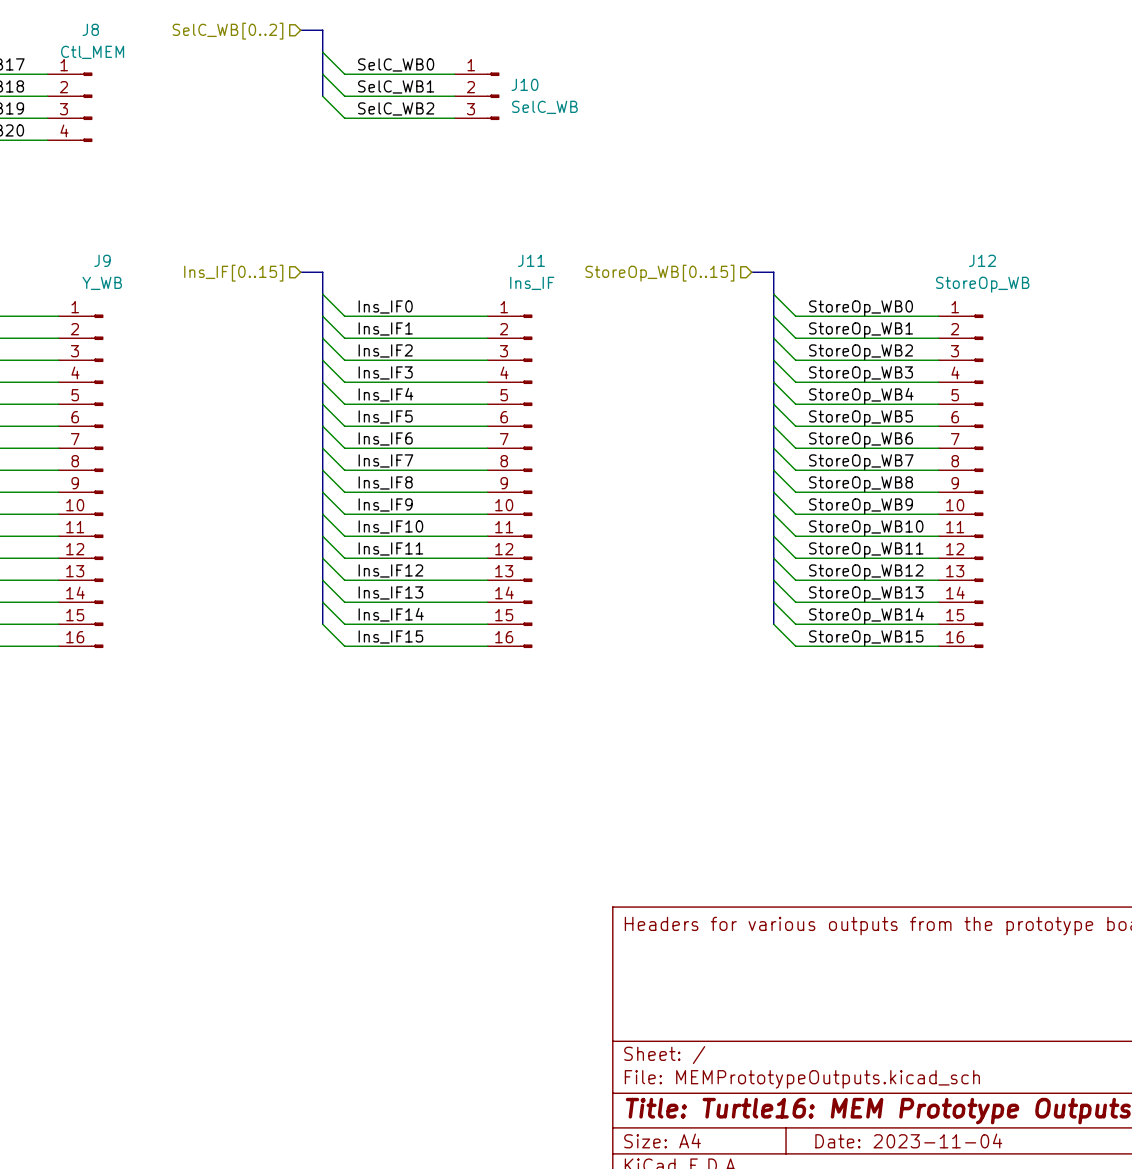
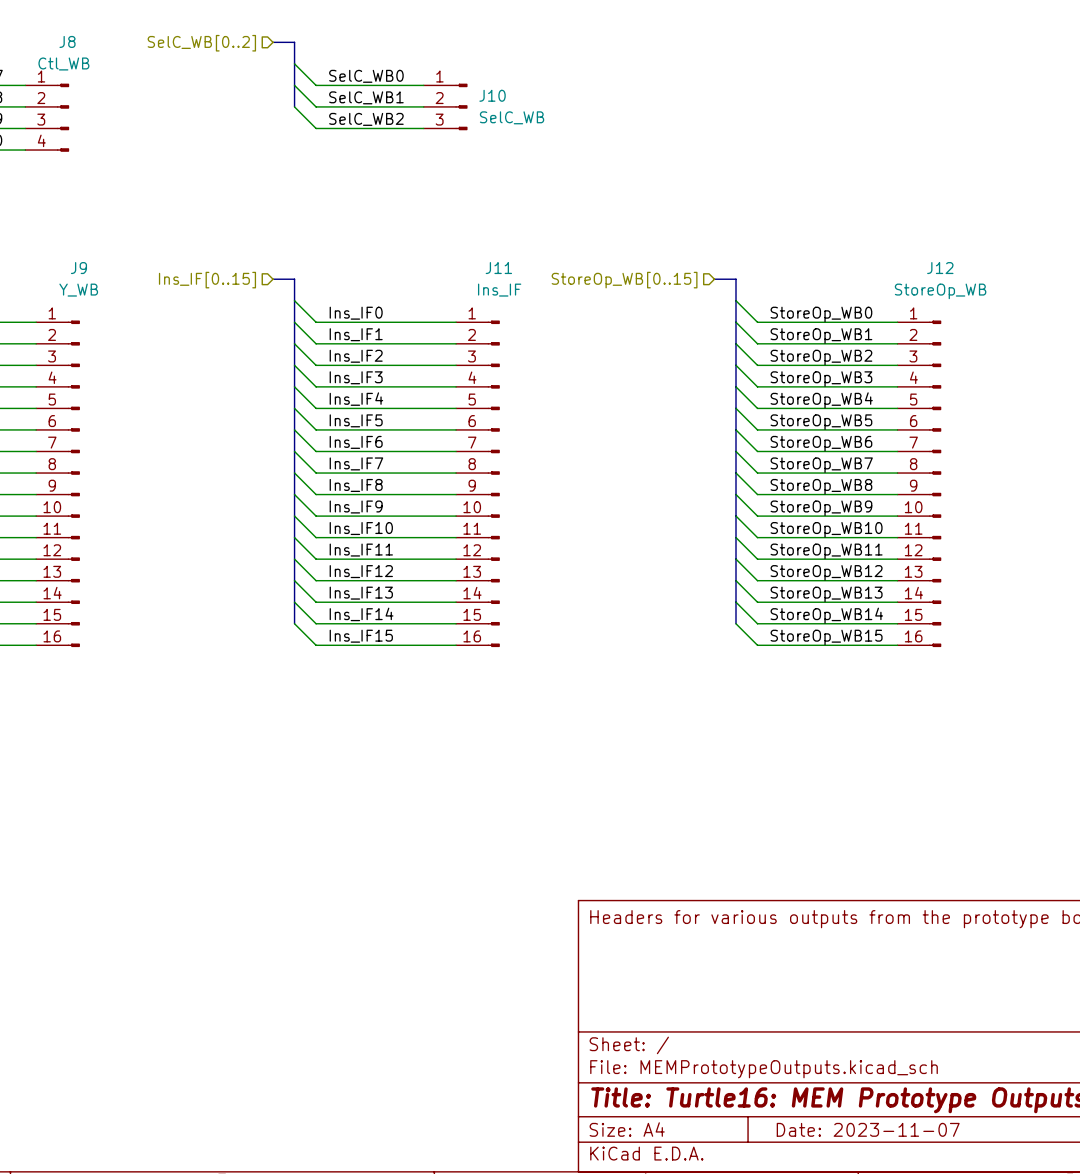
J8 value: Ctl_MEM (92, 52) -> Ctl_WB (63, 63)
title block: Date: 2023-11-04 (908, 1140) -> Date: 2023-11-07 (868, 1129)

